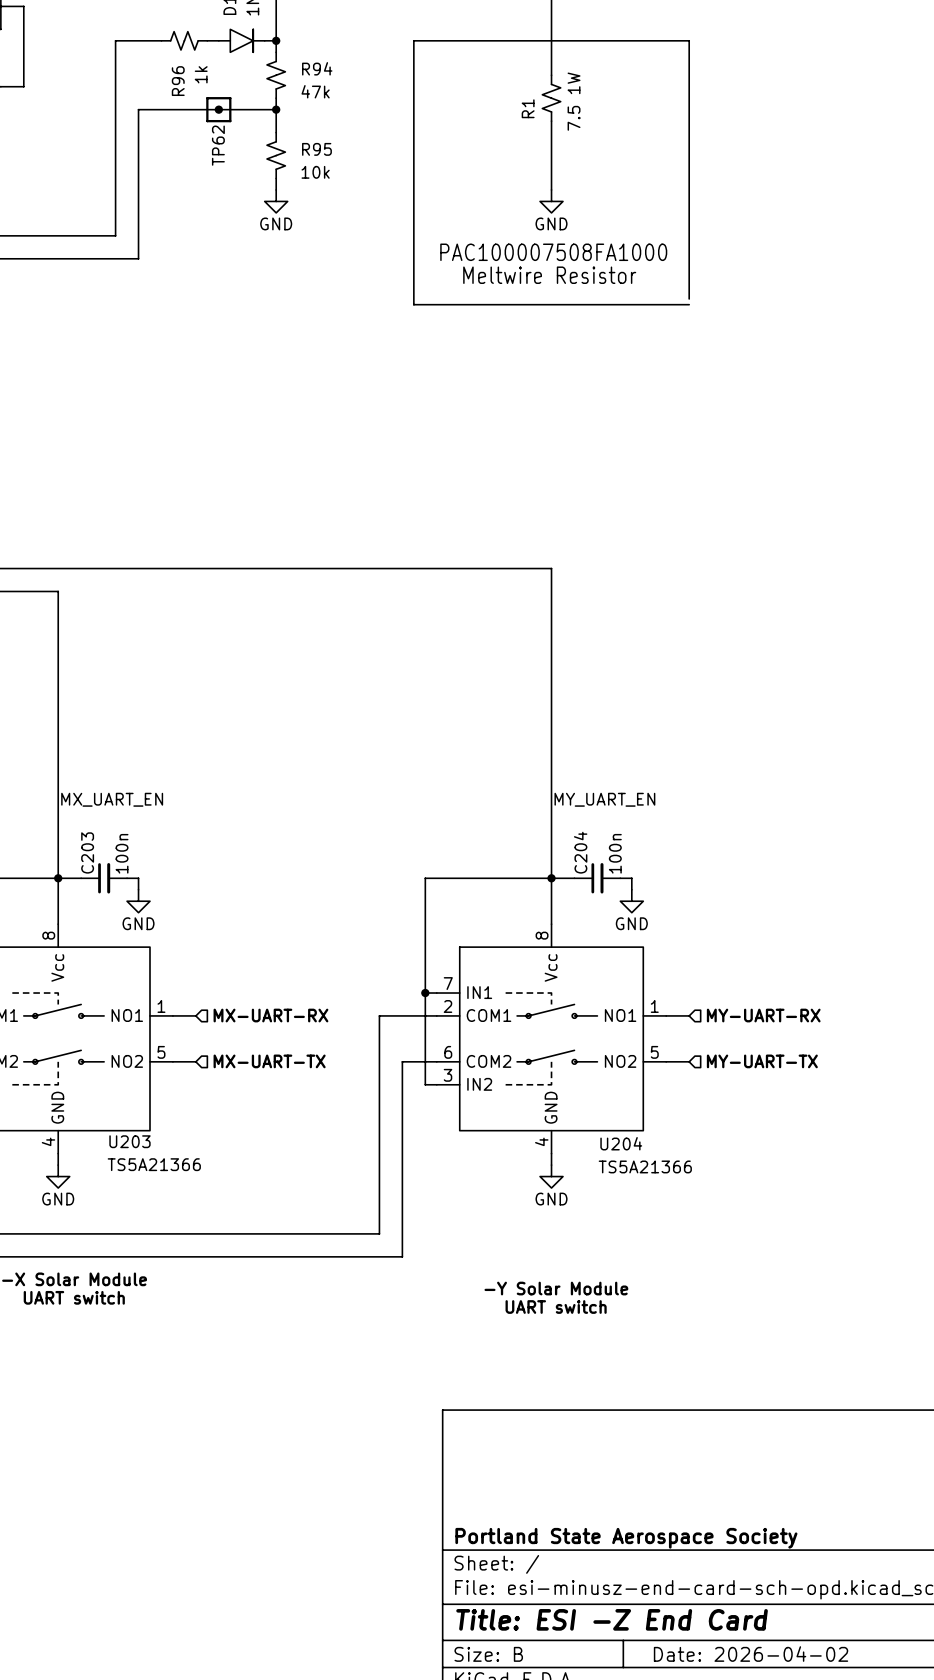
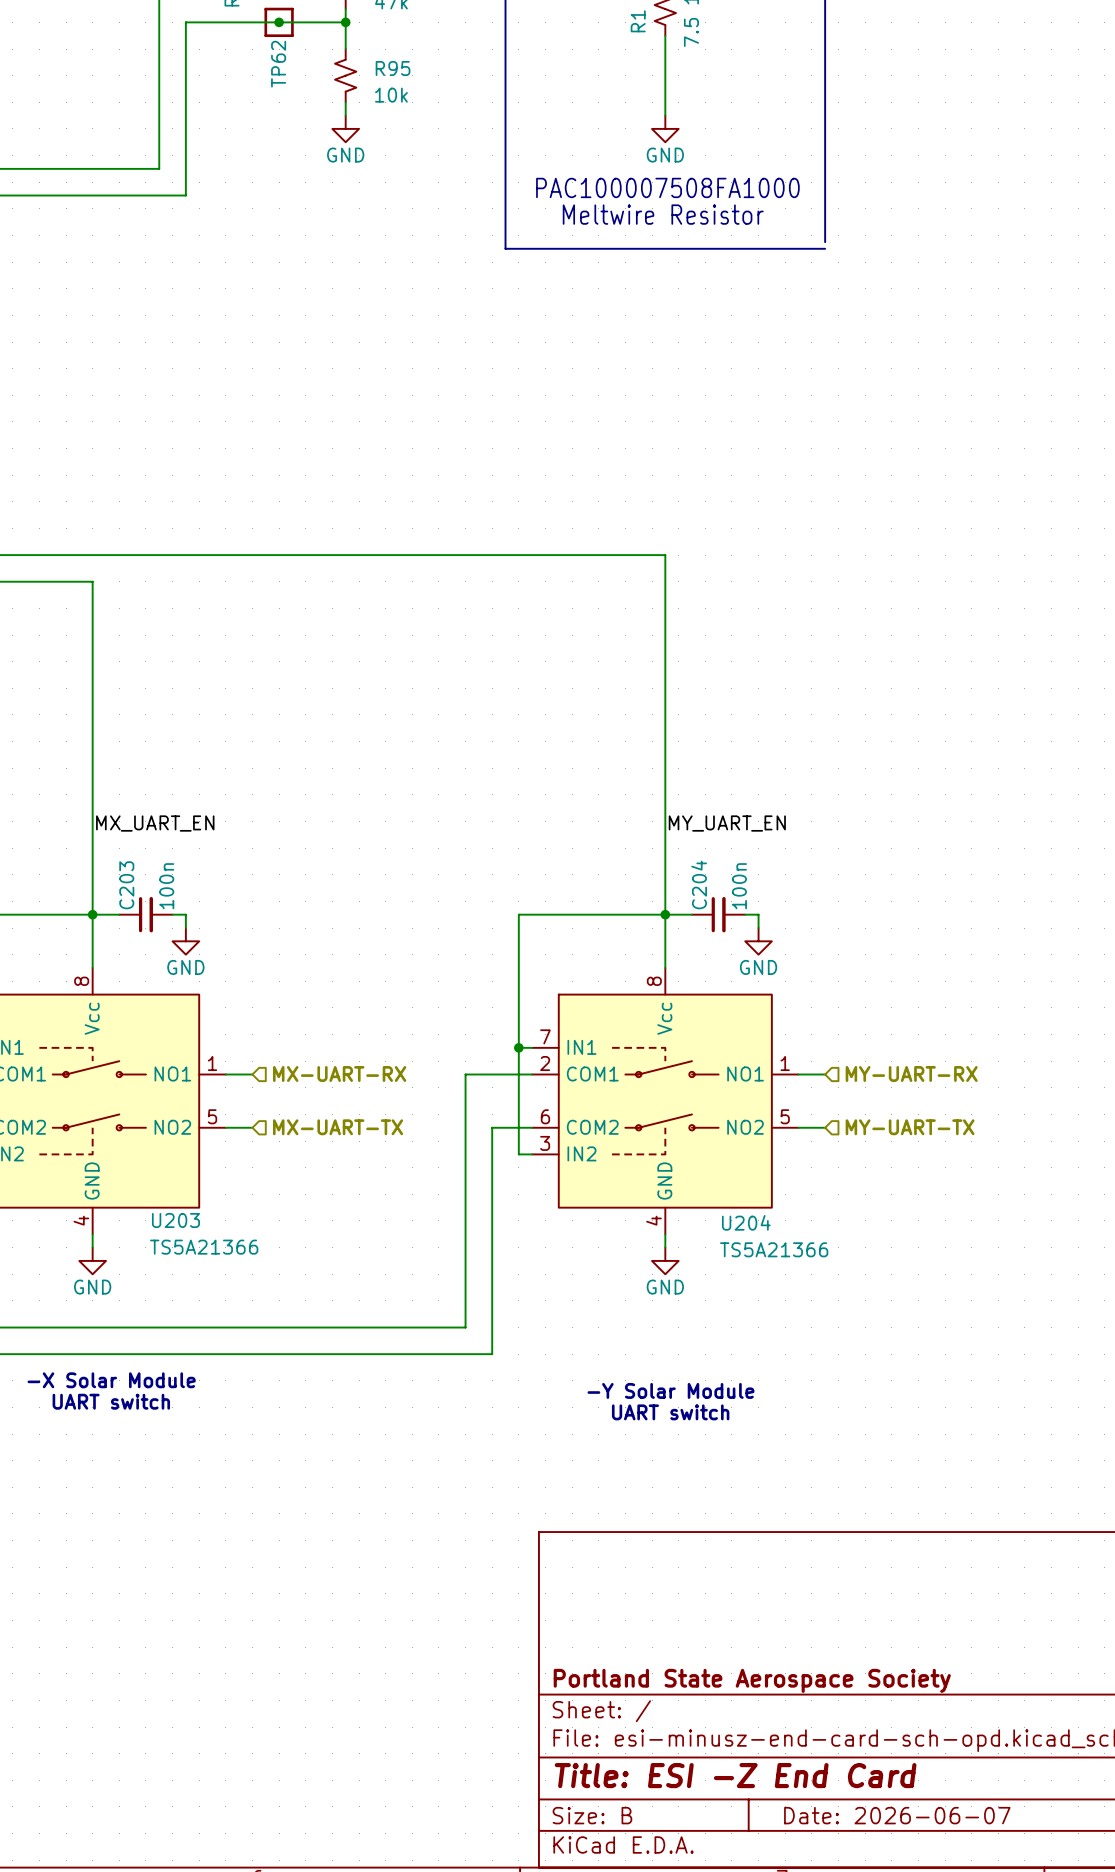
title block: Date: 2026-04-02 (751, 1654) -> Date: 2026-06-07 (897, 1815)

